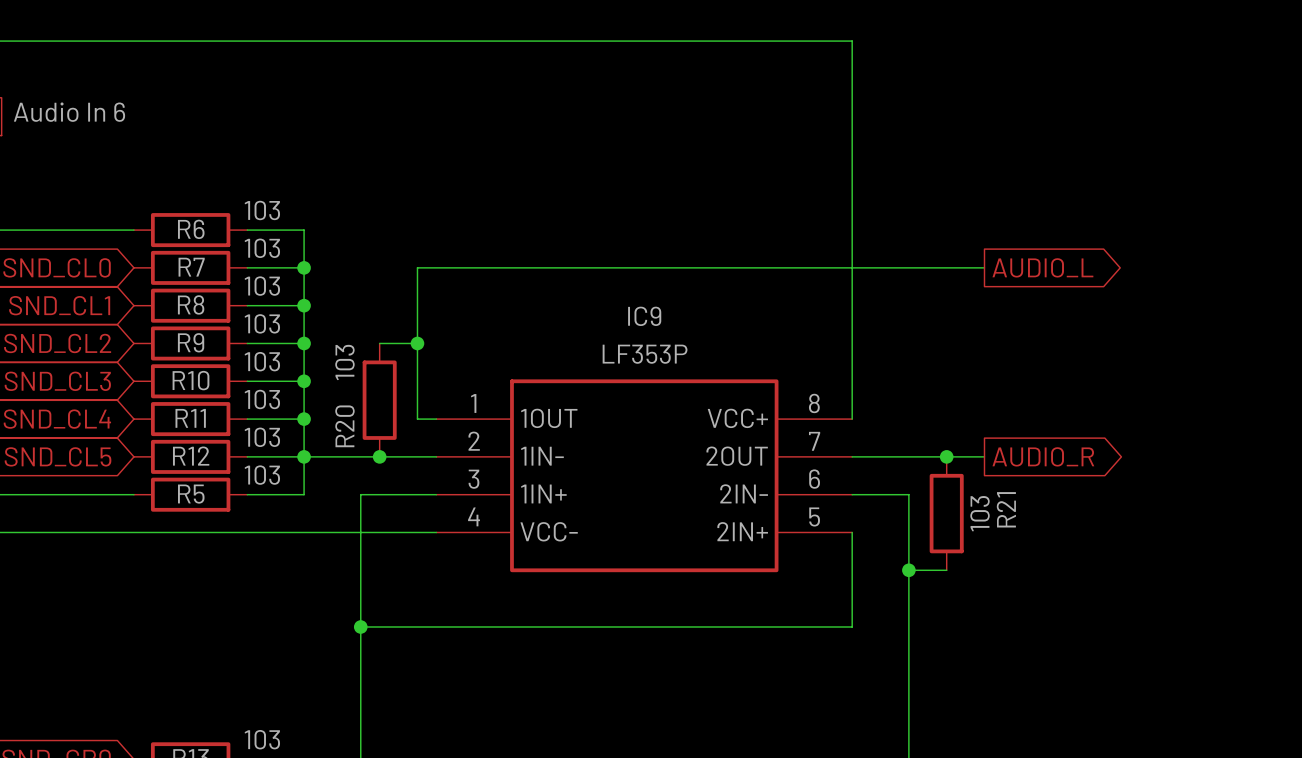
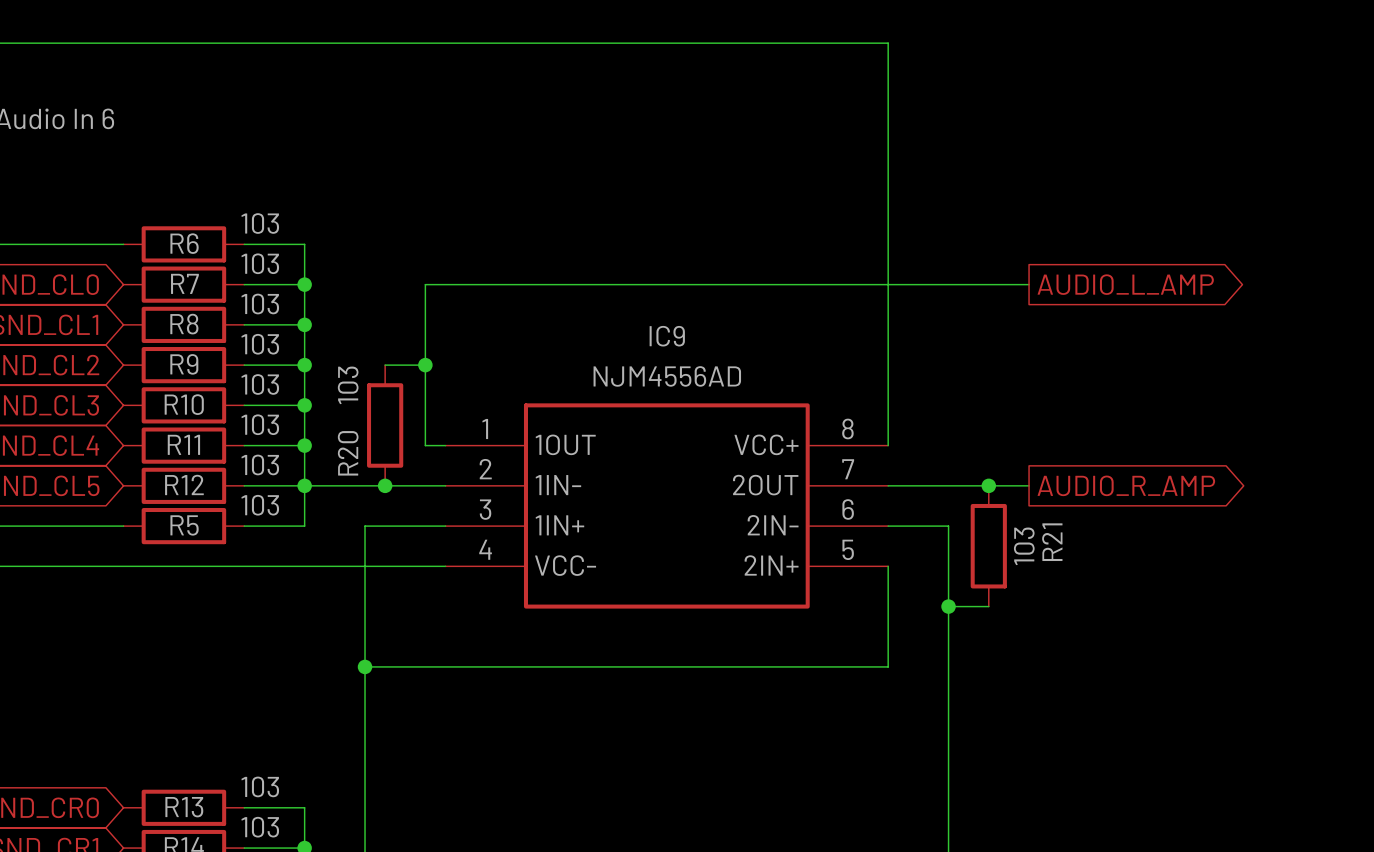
global label: AUDIO_L (1042, 267) -> AUDIO_L_AMP (1125, 284)
IC9 value: LF353P (645, 354) -> NJM4556AD (667, 376)
global label: AUDIO_R (1043, 456) -> AUDIO_R_AMP (1126, 485)

